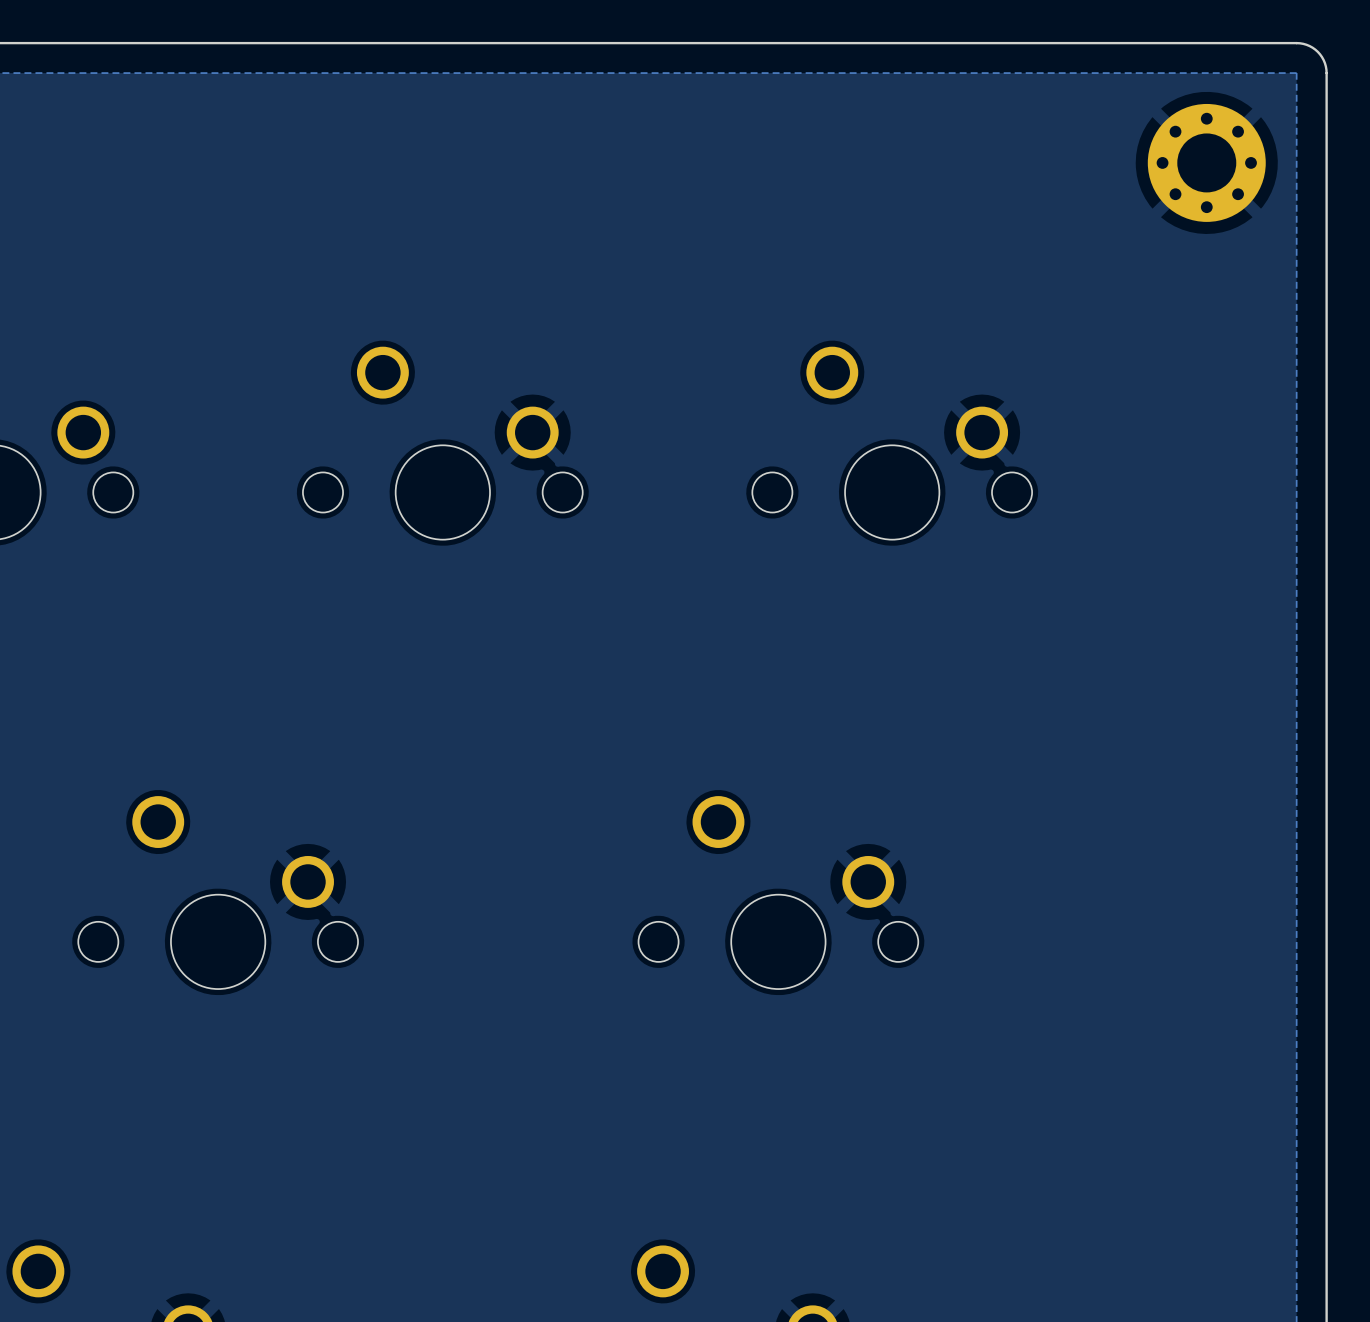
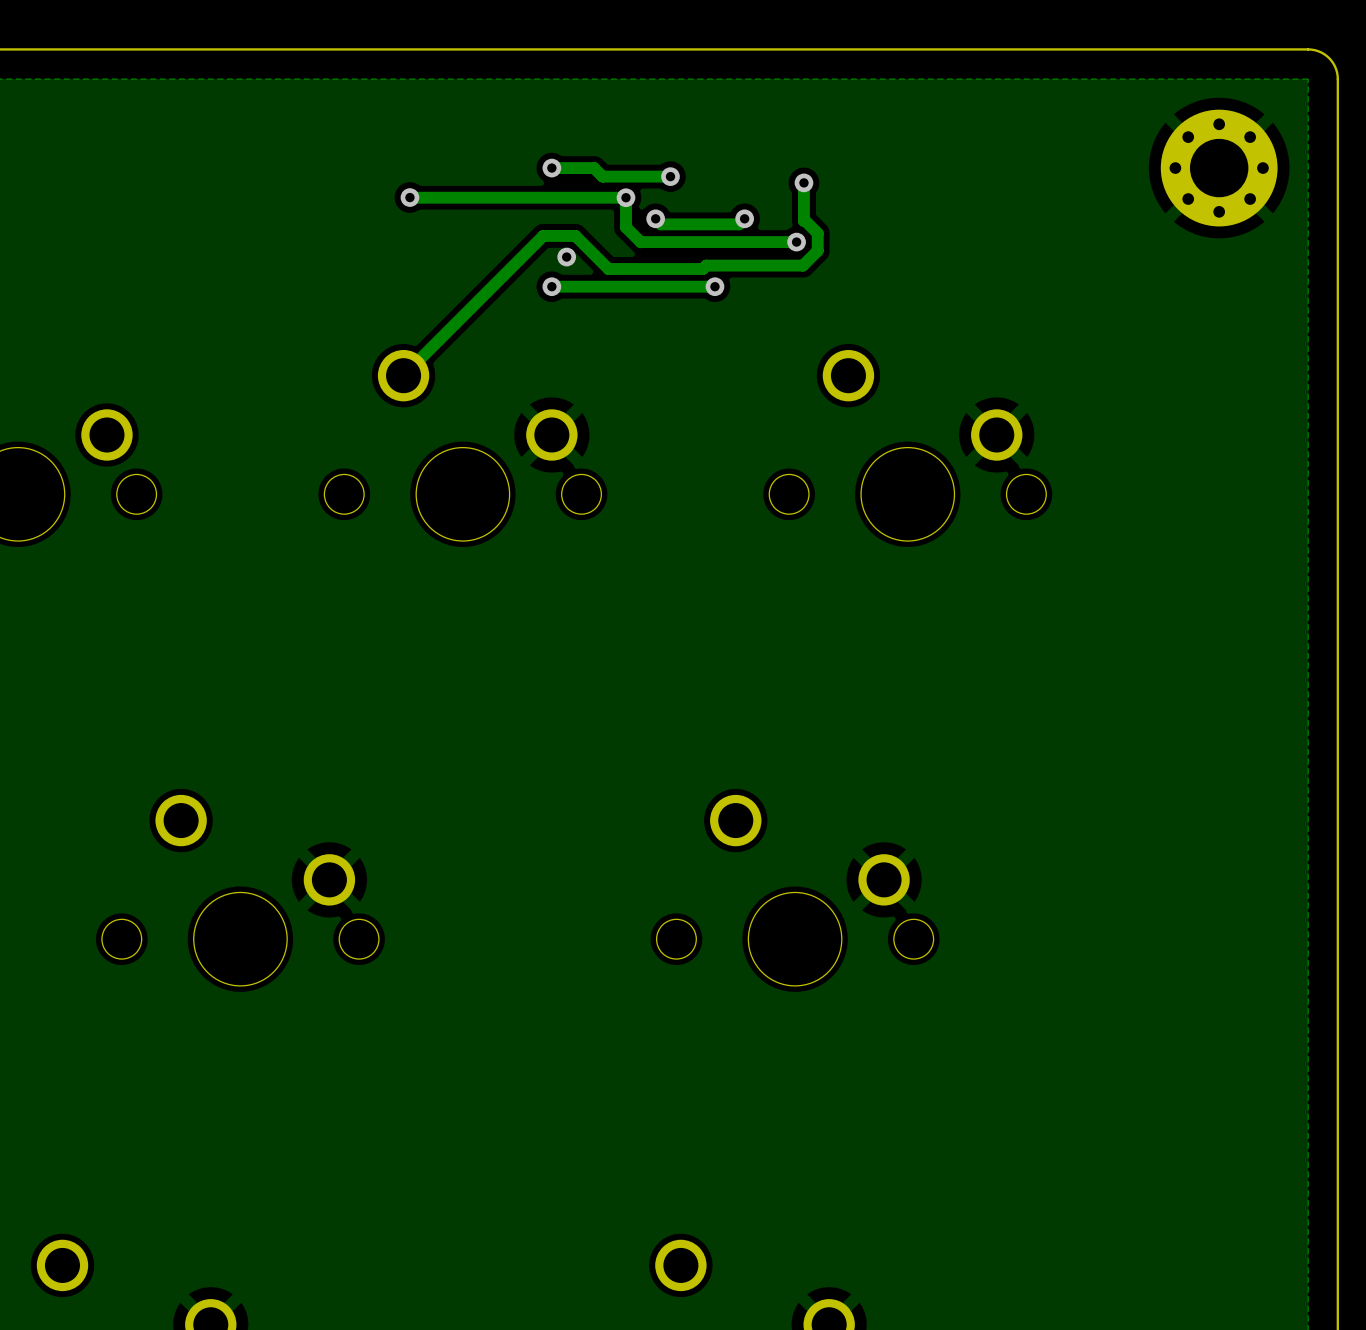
track: none -> (551, 168) (594, 168) (602, 176) (670, 176)
via: none -> (551, 168)
via: none -> (670, 176)
track: none -> (803, 182) (803, 220) (817, 233) (817, 250) (802, 265) (706, 265) (702, 269) (608, 269) (575, 235) (543, 235) (403, 375)
via: none -> (803, 182)
track: none -> (410, 197) (626, 197) (626, 227) (640, 242)
via: none -> (409, 197)
via: none -> (626, 197)
via: none -> (655, 218)
track: none -> (744, 218) (739, 224) (661, 224) (655, 218)
via: none -> (744, 218)
track: none -> (796, 242) (640, 242)
via: none -> (796, 242)
via: none -> (566, 257)
via: none -> (551, 286)
track: none -> (714, 286) (551, 286)
via: none -> (714, 286)

